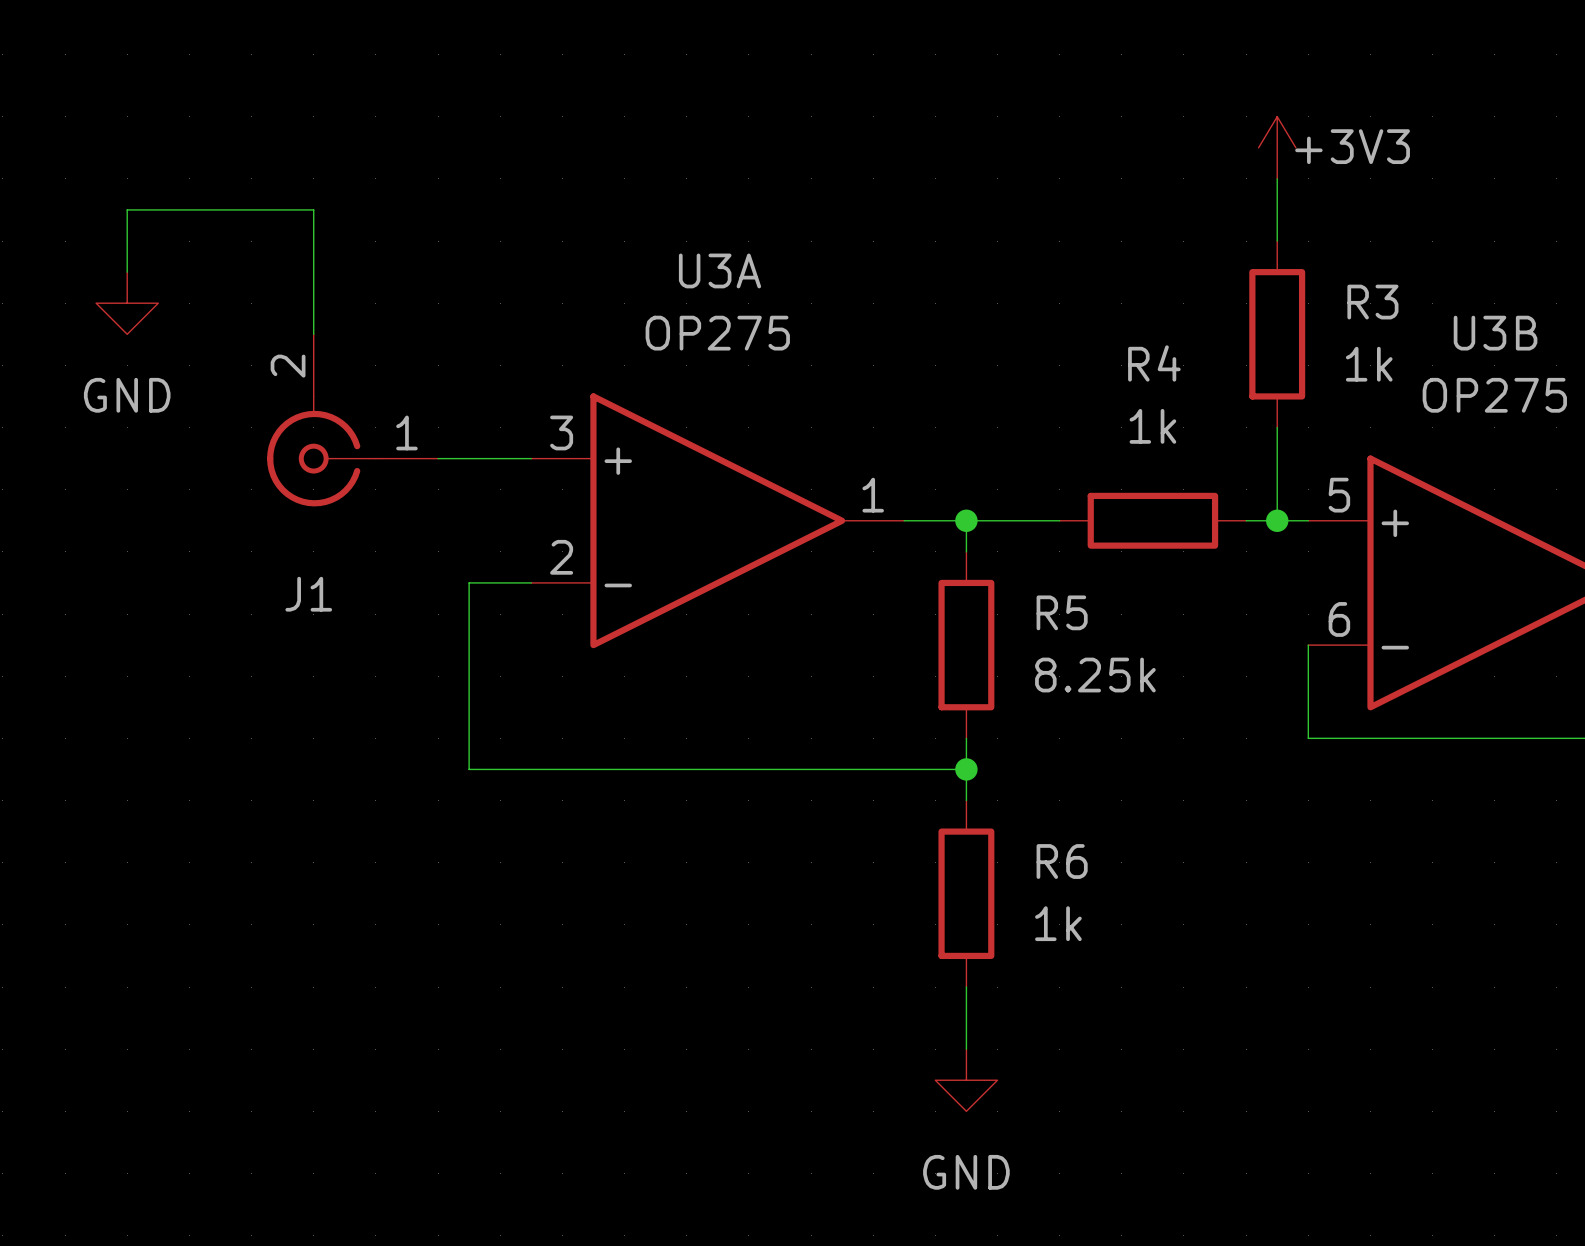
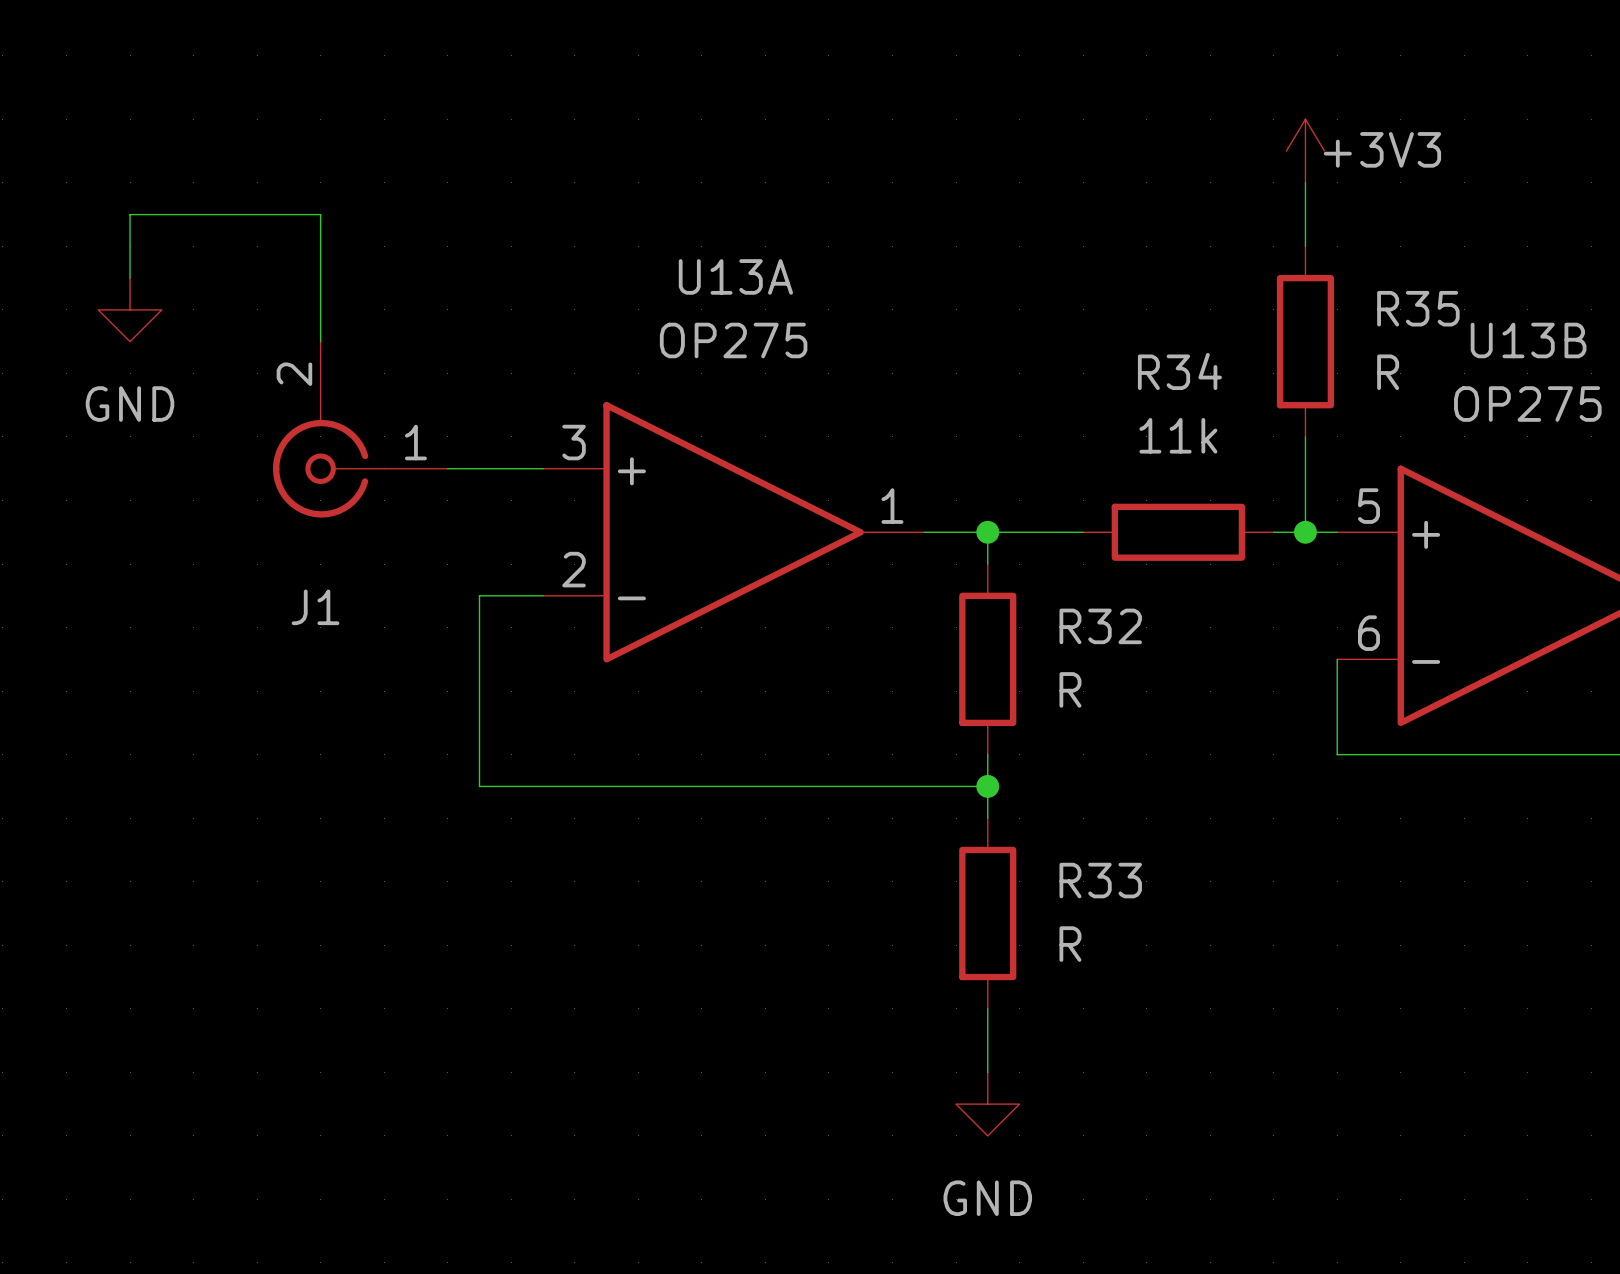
U3A name: U3A (719, 270) -> U13A (735, 276)
R3 name: R3 (1372, 302) -> R35 (1418, 308)
U3B name: U3B (1495, 333) -> U13B (1528, 340)
R4 name: R4 (1154, 363) -> R34 (1179, 371)
R3 value: 1k (1369, 364) -> R (1388, 372)
R4 value: 1k (1152, 426) -> 11k (1178, 435)
R5 name: R5 (1062, 612) -> R32 (1100, 626)
R5 value: 8.25k (1095, 675) -> R (1070, 689)
R6 name: R6 (1062, 861) -> R33 (1100, 880)
R6 value: 1k (1058, 923) -> R (1070, 944)

